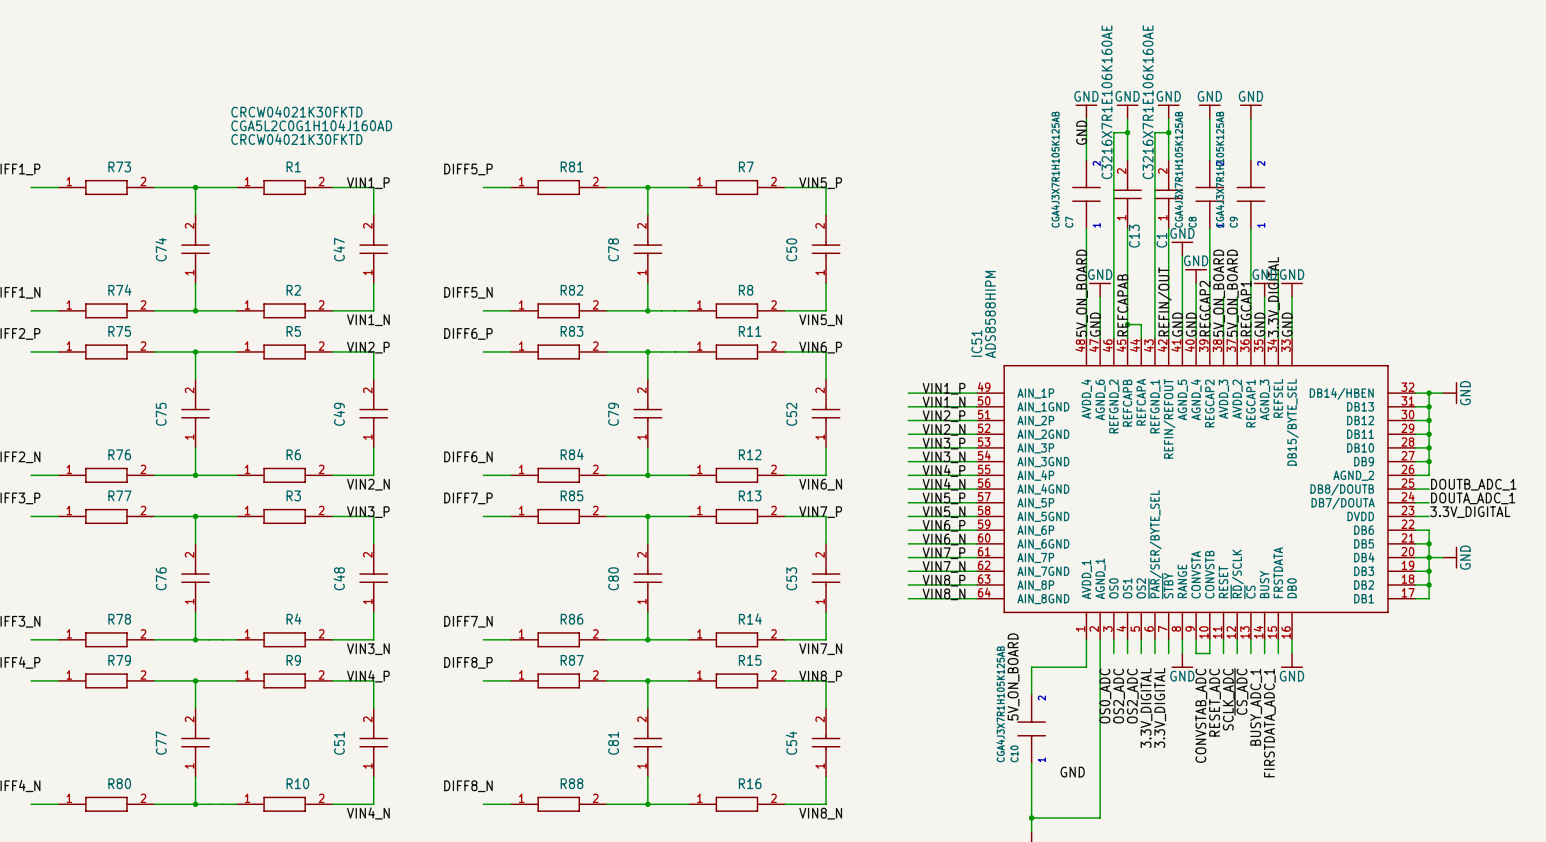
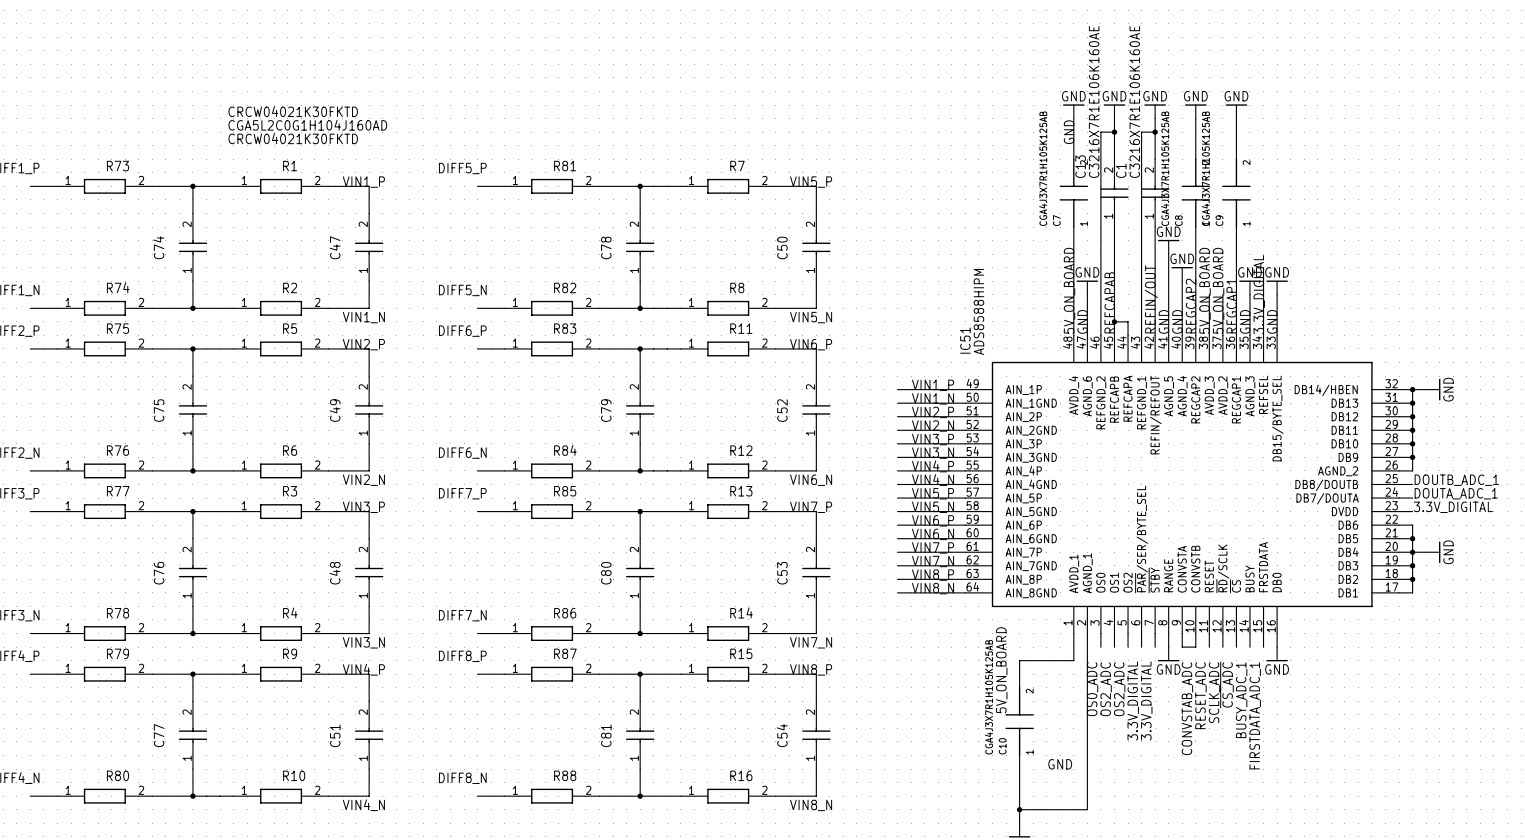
C13 name position: C13 (1134, 236) -> C13 (1080, 166)
C1 name position: C1 (1161, 240) -> C1 (1121, 170)

